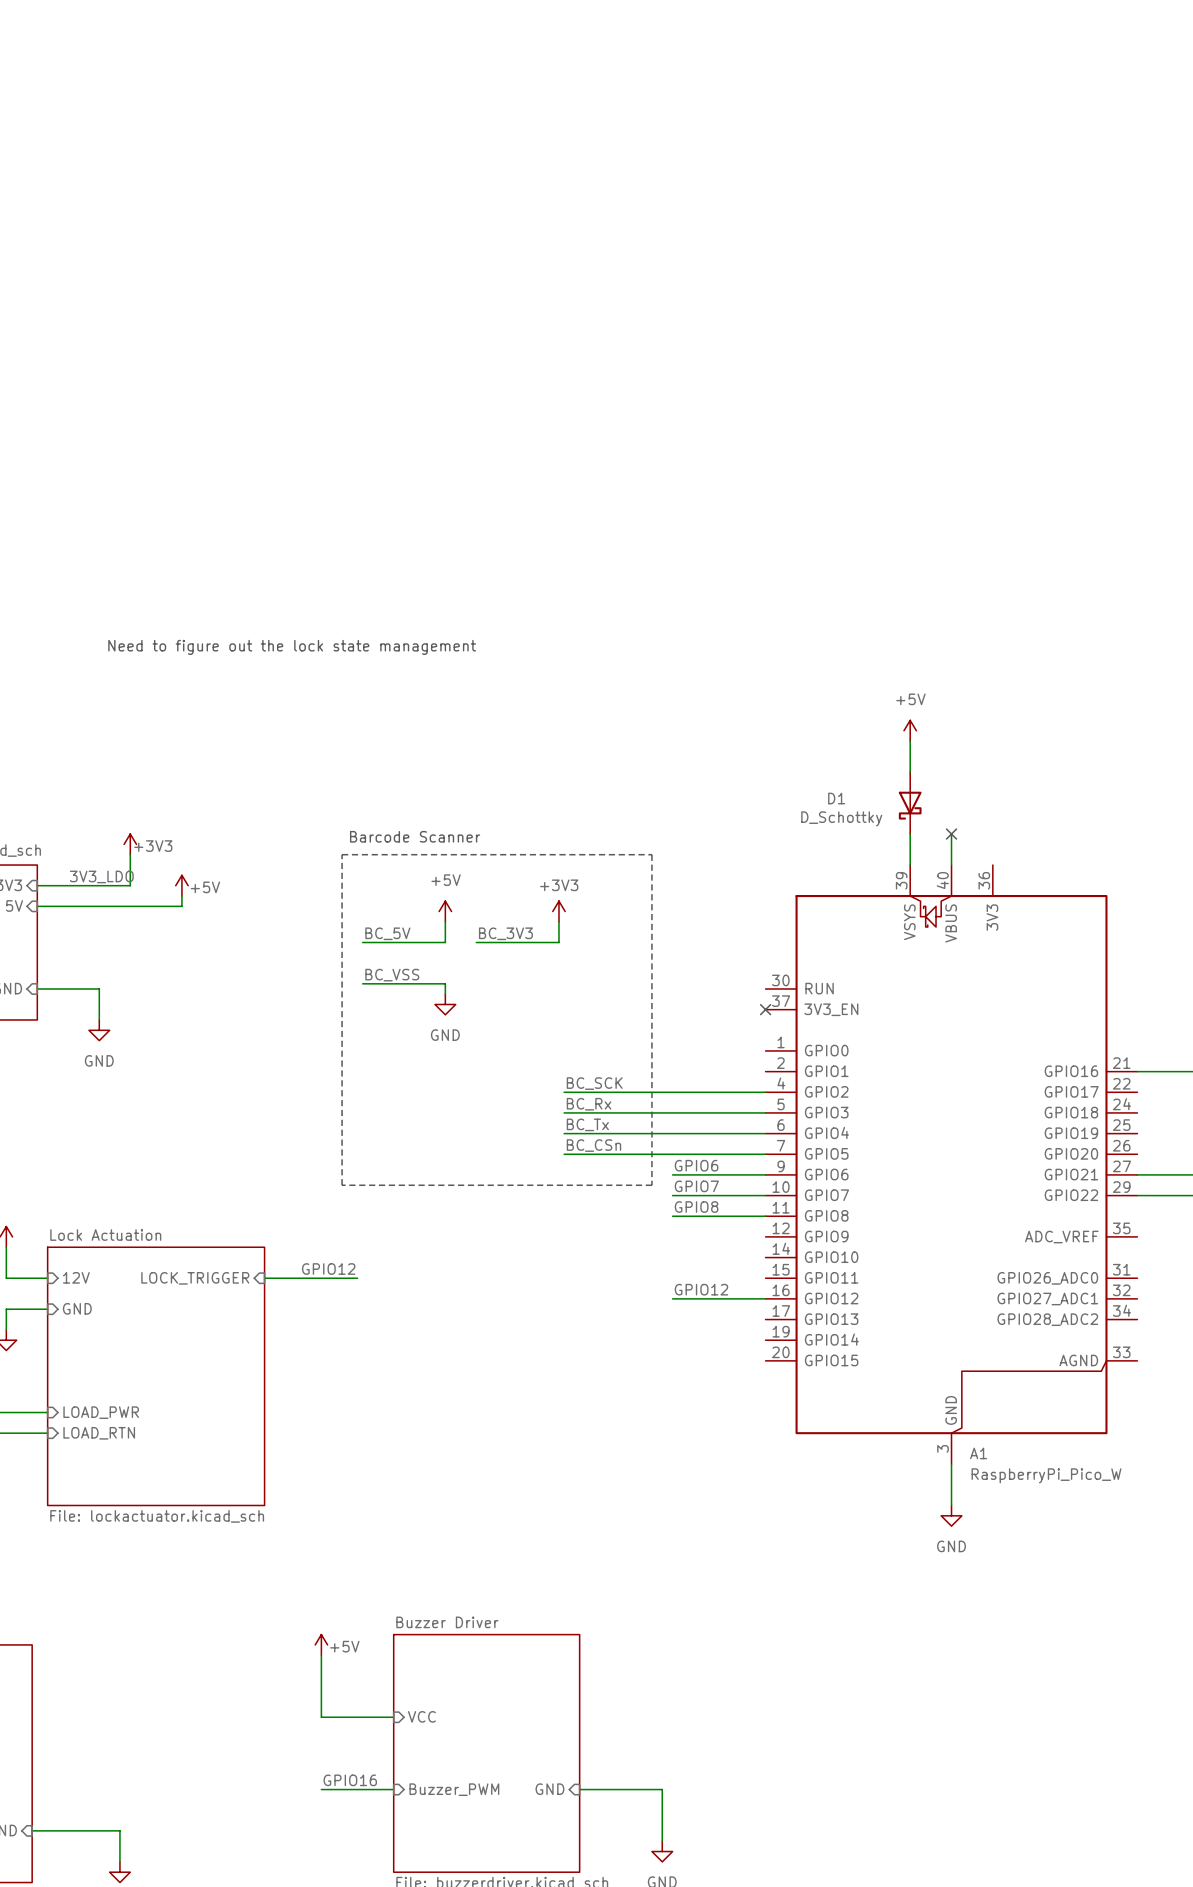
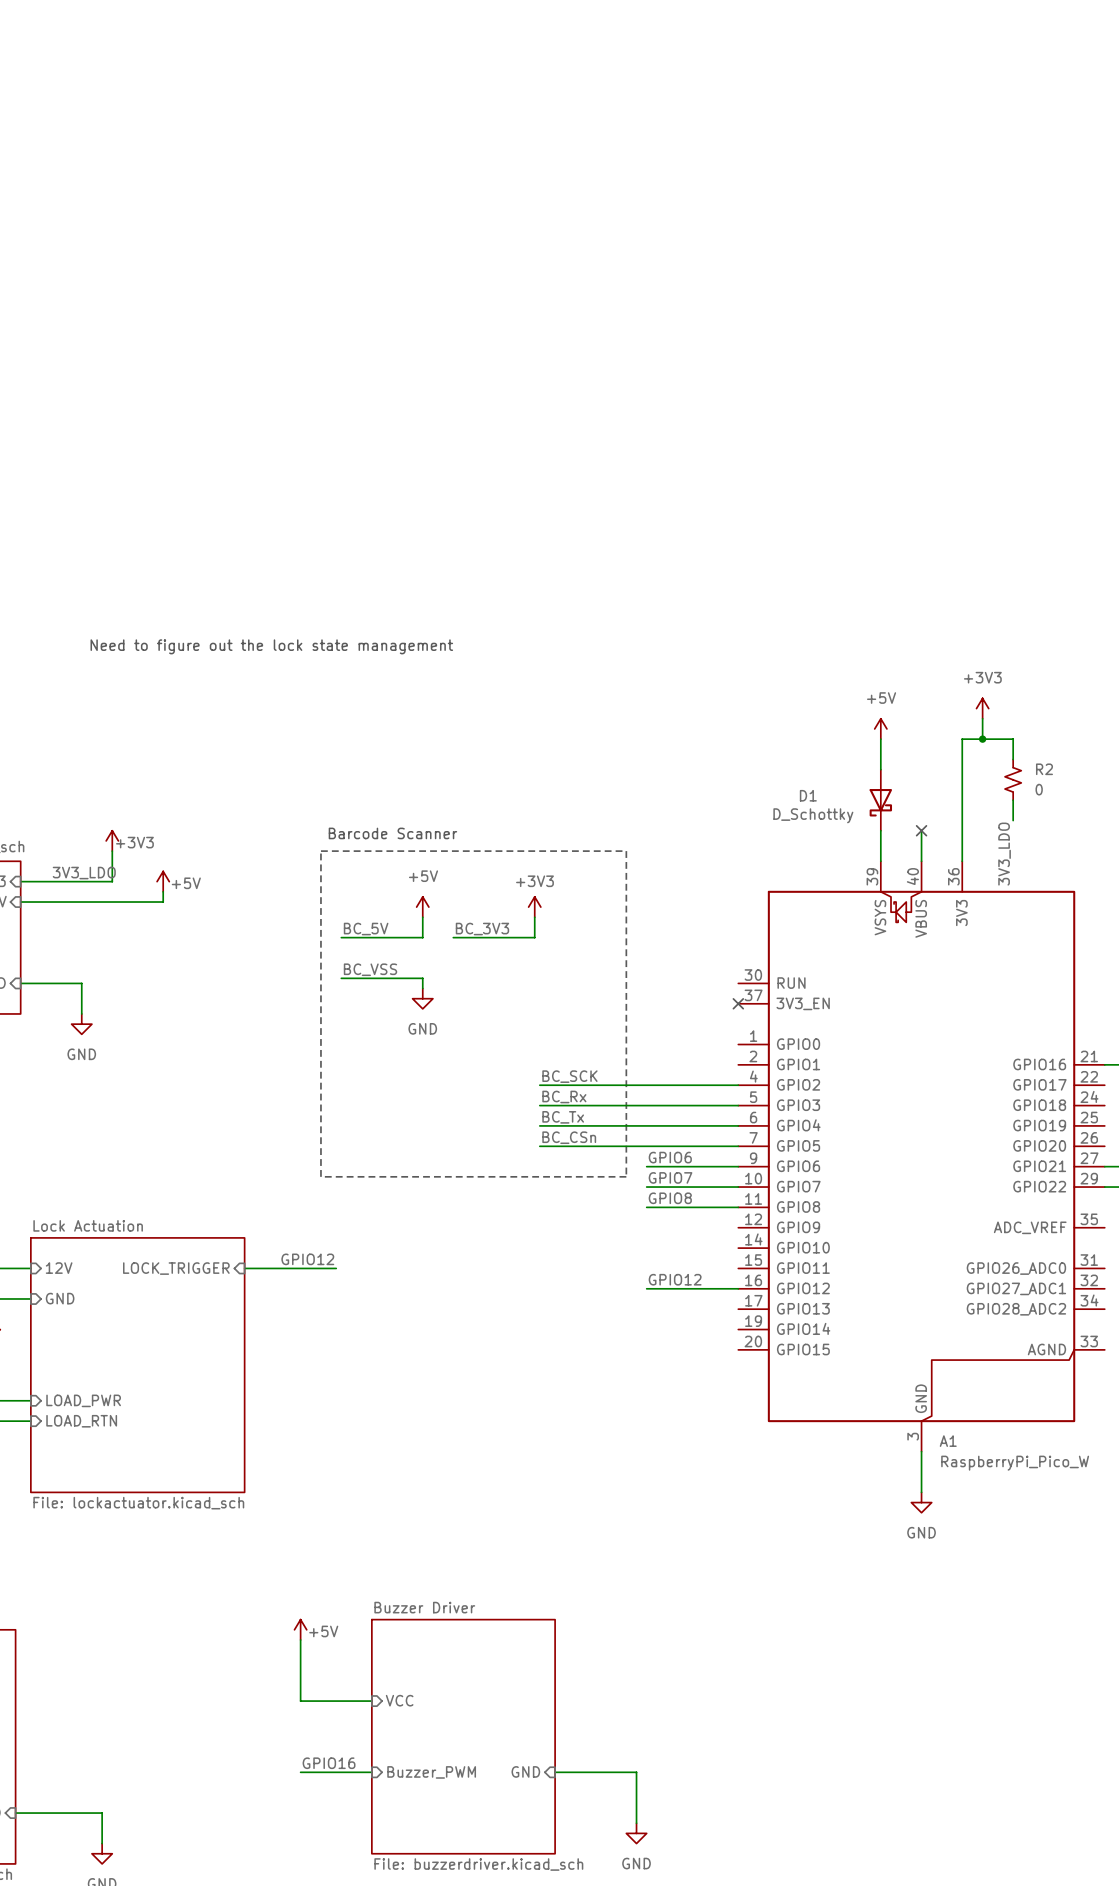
power symbol: none -> +3V3 (982, 708)
wire: none -> (982, 718) (982, 739)
junction: none -> (982, 739)
wire: none -> (1013, 759) (1013, 739) (962, 739) (962, 861)
R2: none -> 0 (1013, 779)
wire: none -> (1013, 800) (1013, 820)
label: none -> 3V3_LDO (1004, 854)

